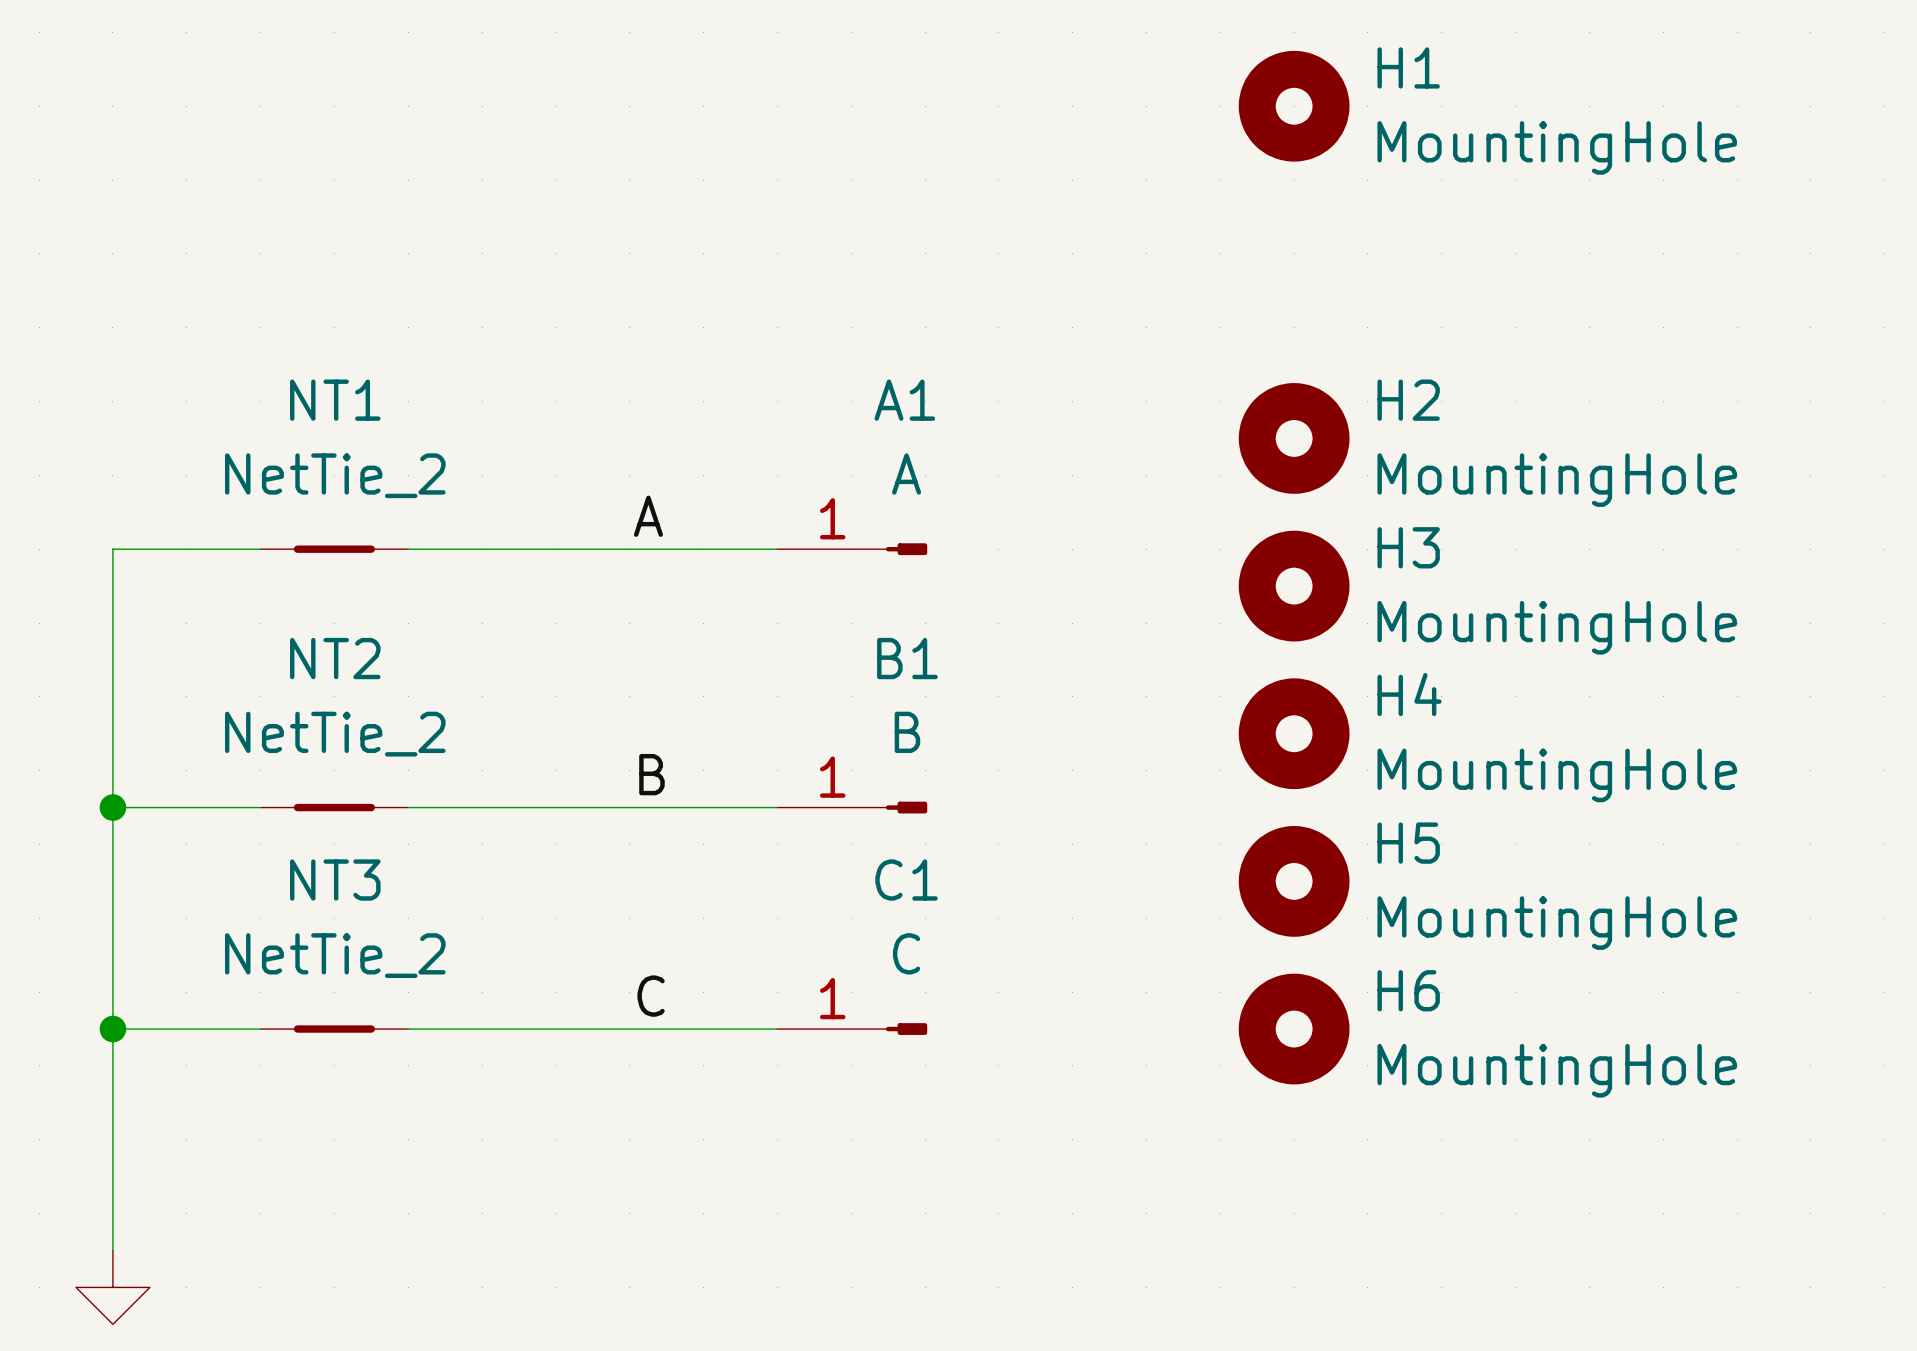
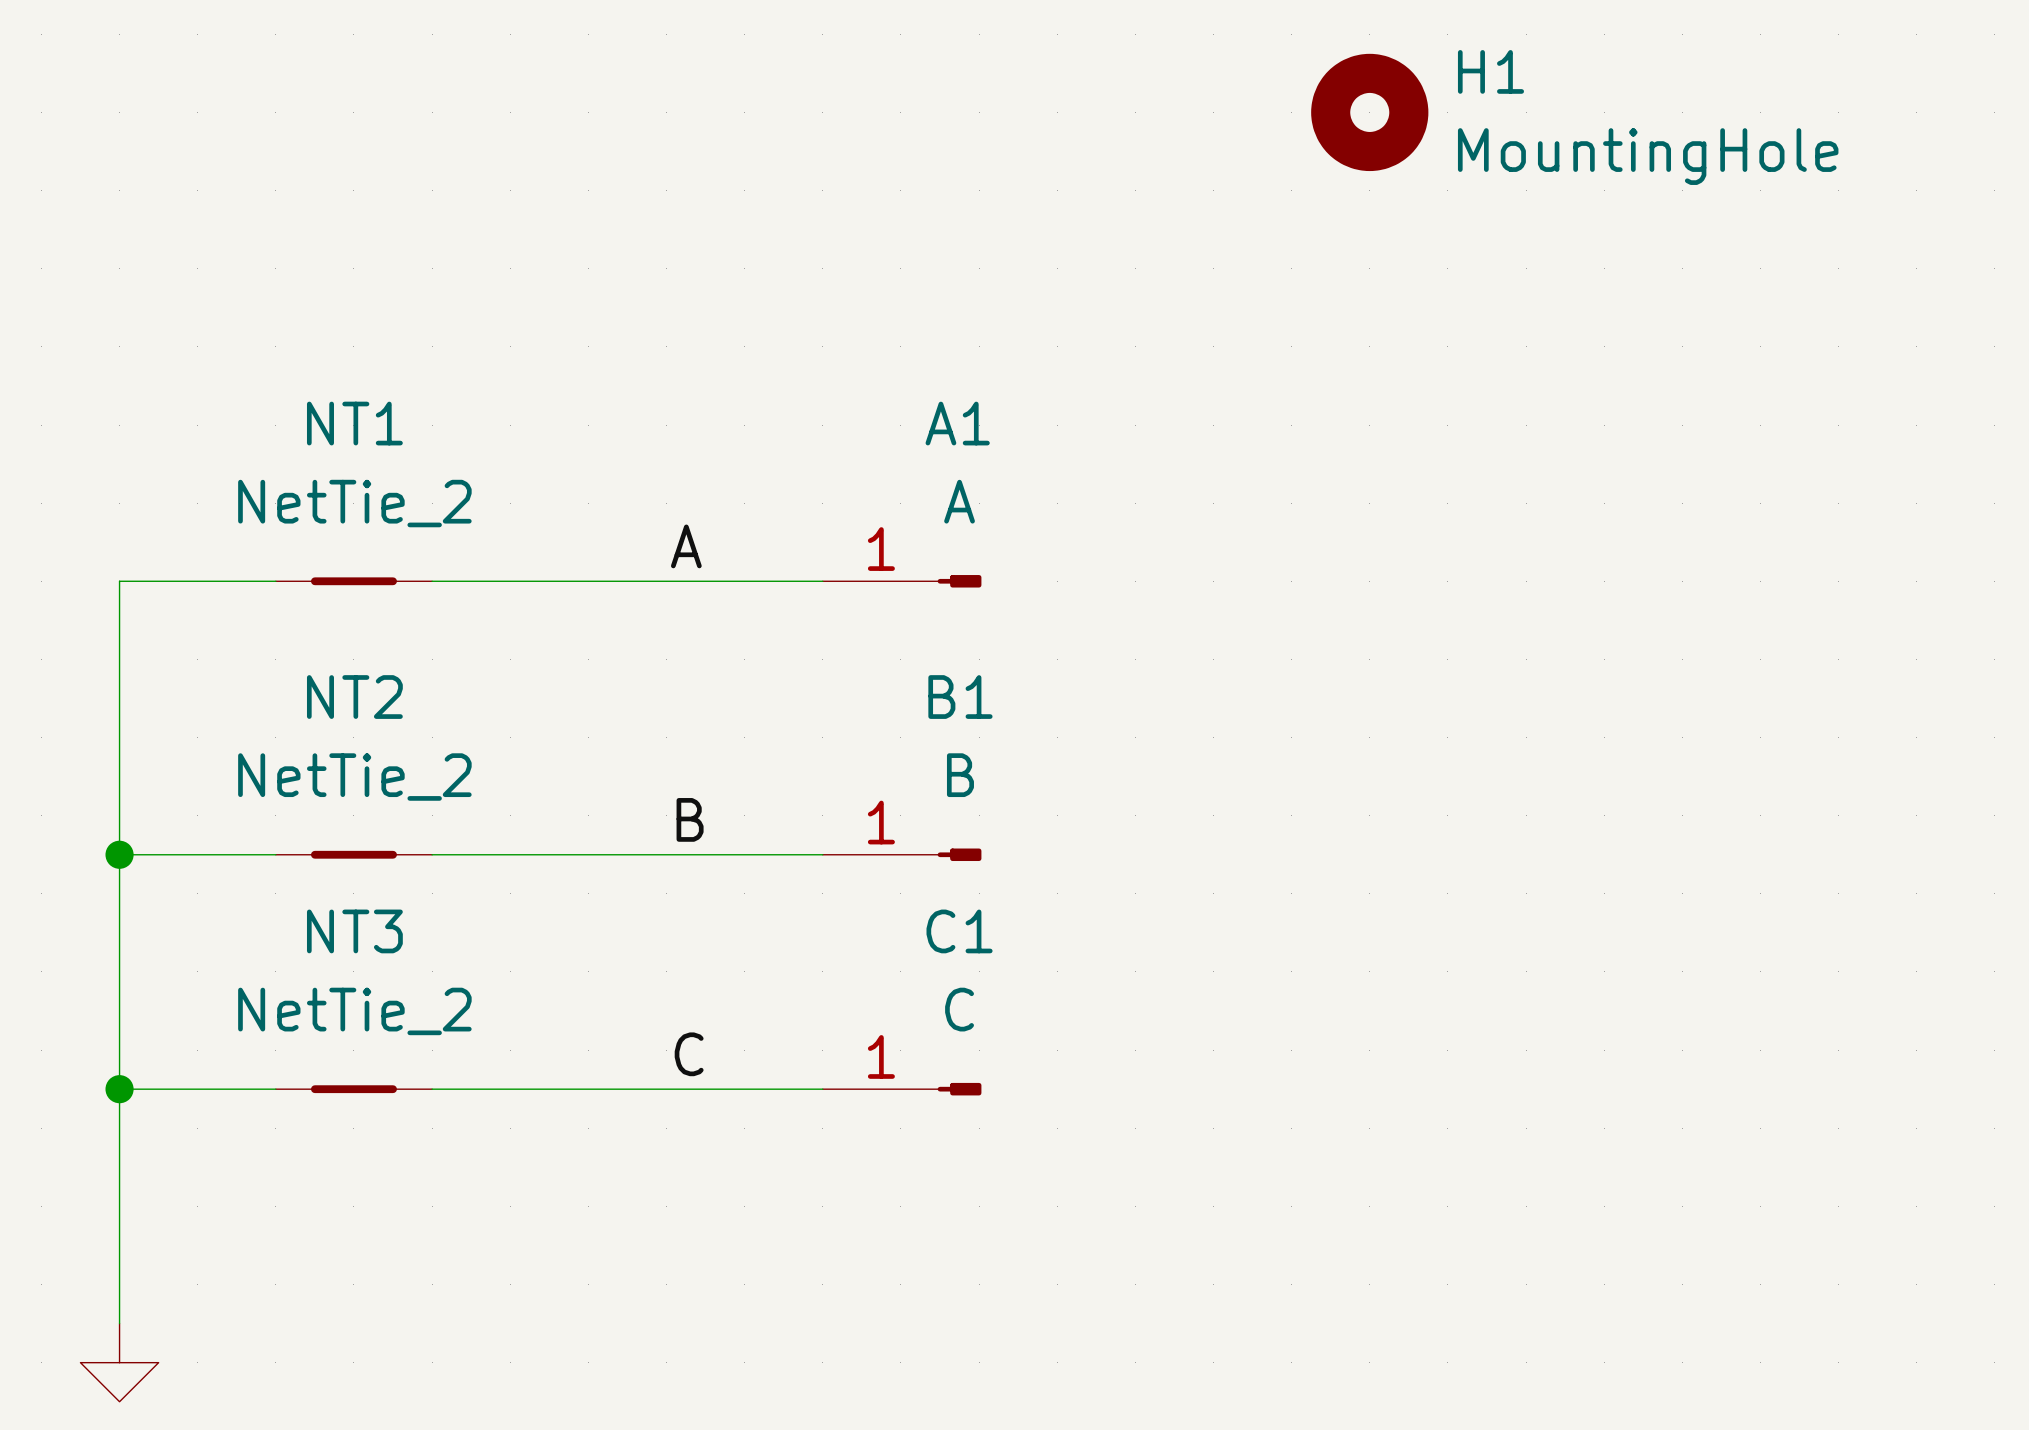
H2: MountingHole (1294, 438) -> none
H3: MountingHole (1294, 586) -> none
H4: MountingHole (1294, 733) -> none
H5: MountingHole (1294, 881) -> none
H6: MountingHole (1294, 1029) -> none

